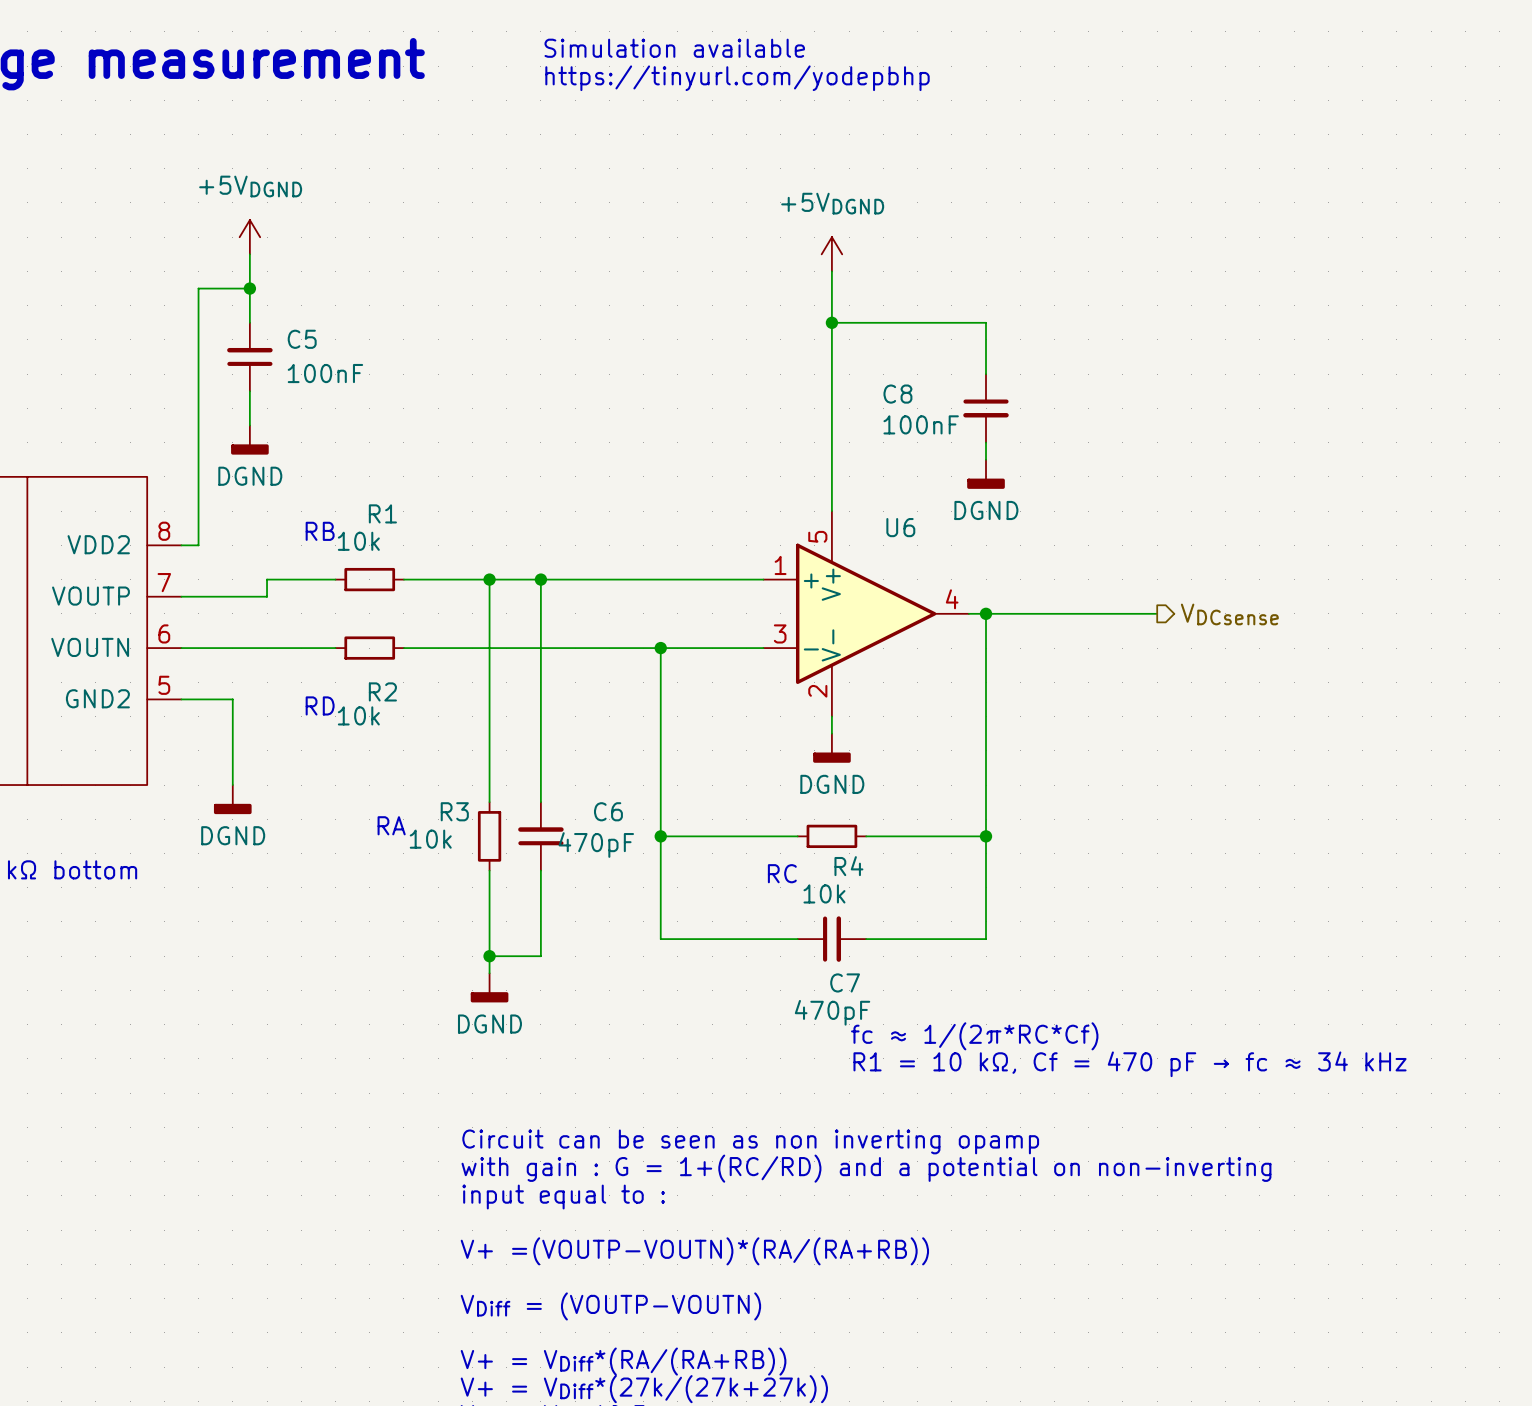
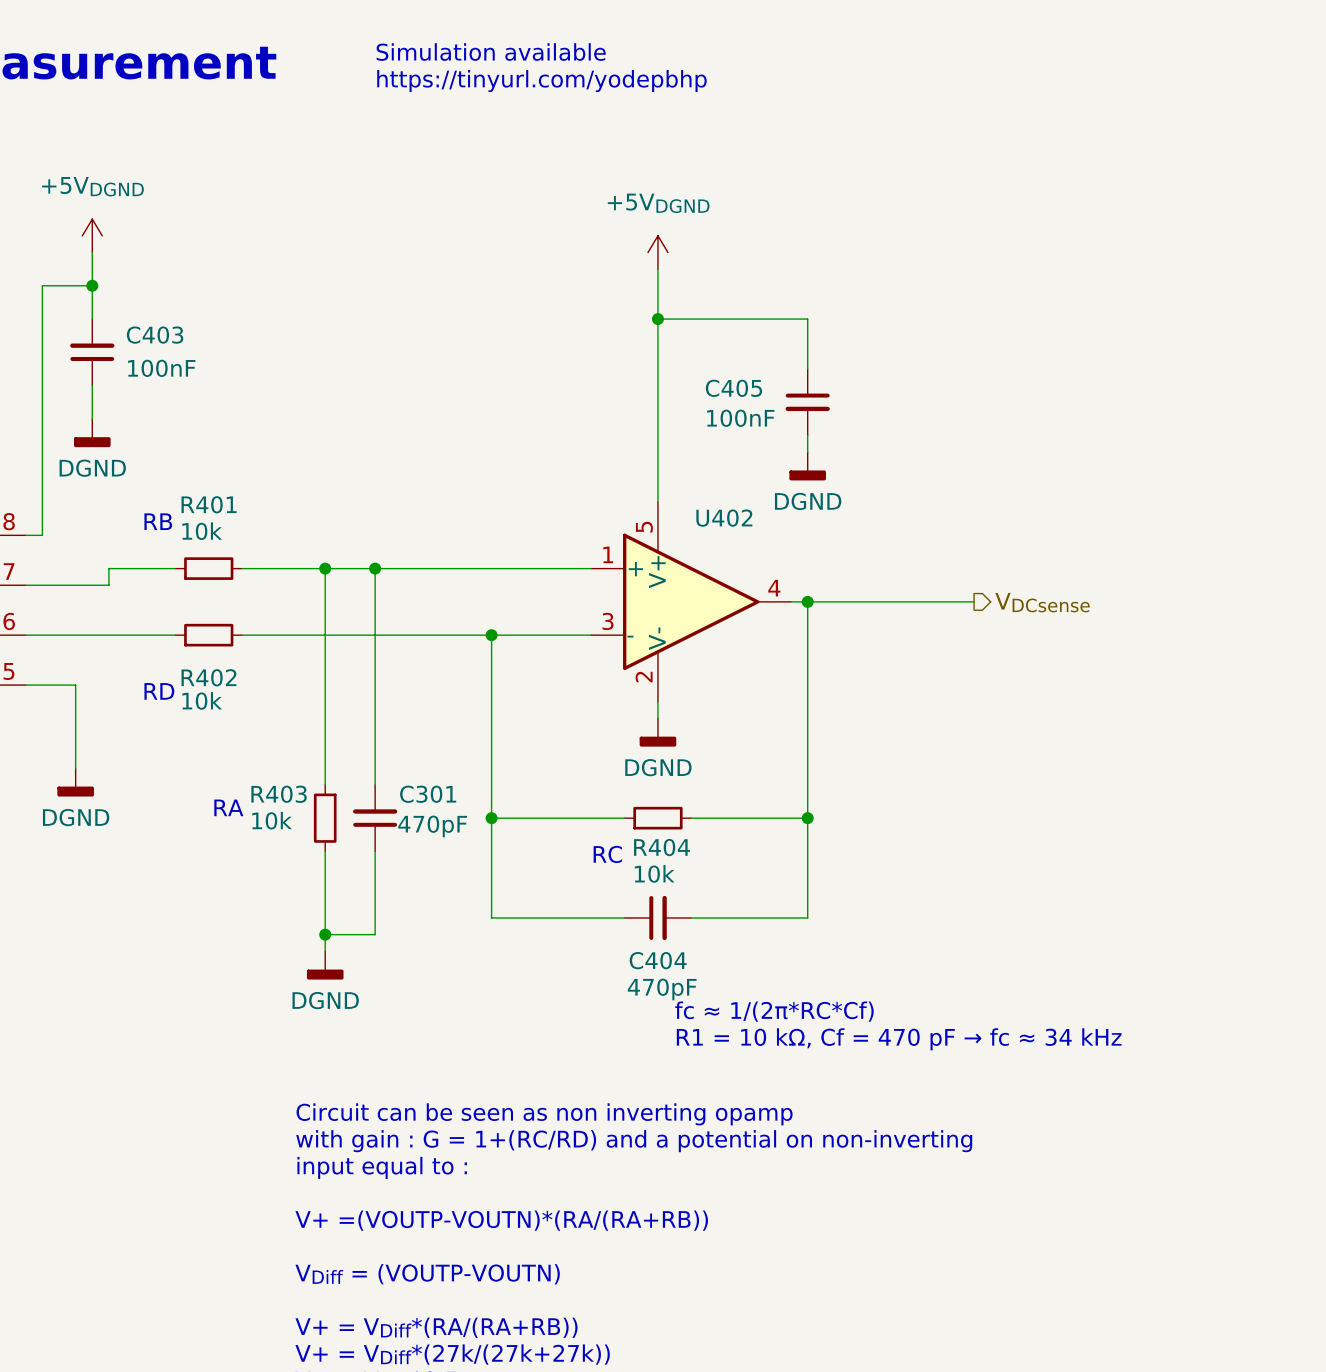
C5 name: C5 (302, 339) -> C403 (155, 335)
C8 name: C8 (897, 394) -> C405 (733, 388)
R1 name: R1 (382, 513) -> R401 (209, 504)
U6 name: U6 (900, 527) -> U402 (724, 518)
R2 name: R2 (382, 691) -> R402 (208, 677)
R3 name: R3 (454, 811) -> R403 (279, 794)
C6 name: C6 (608, 811) -> C301 (428, 794)
R4 name: R4 (848, 866) -> R404 (662, 847)
C7 name: C7 (845, 982) -> C404 (658, 960)

